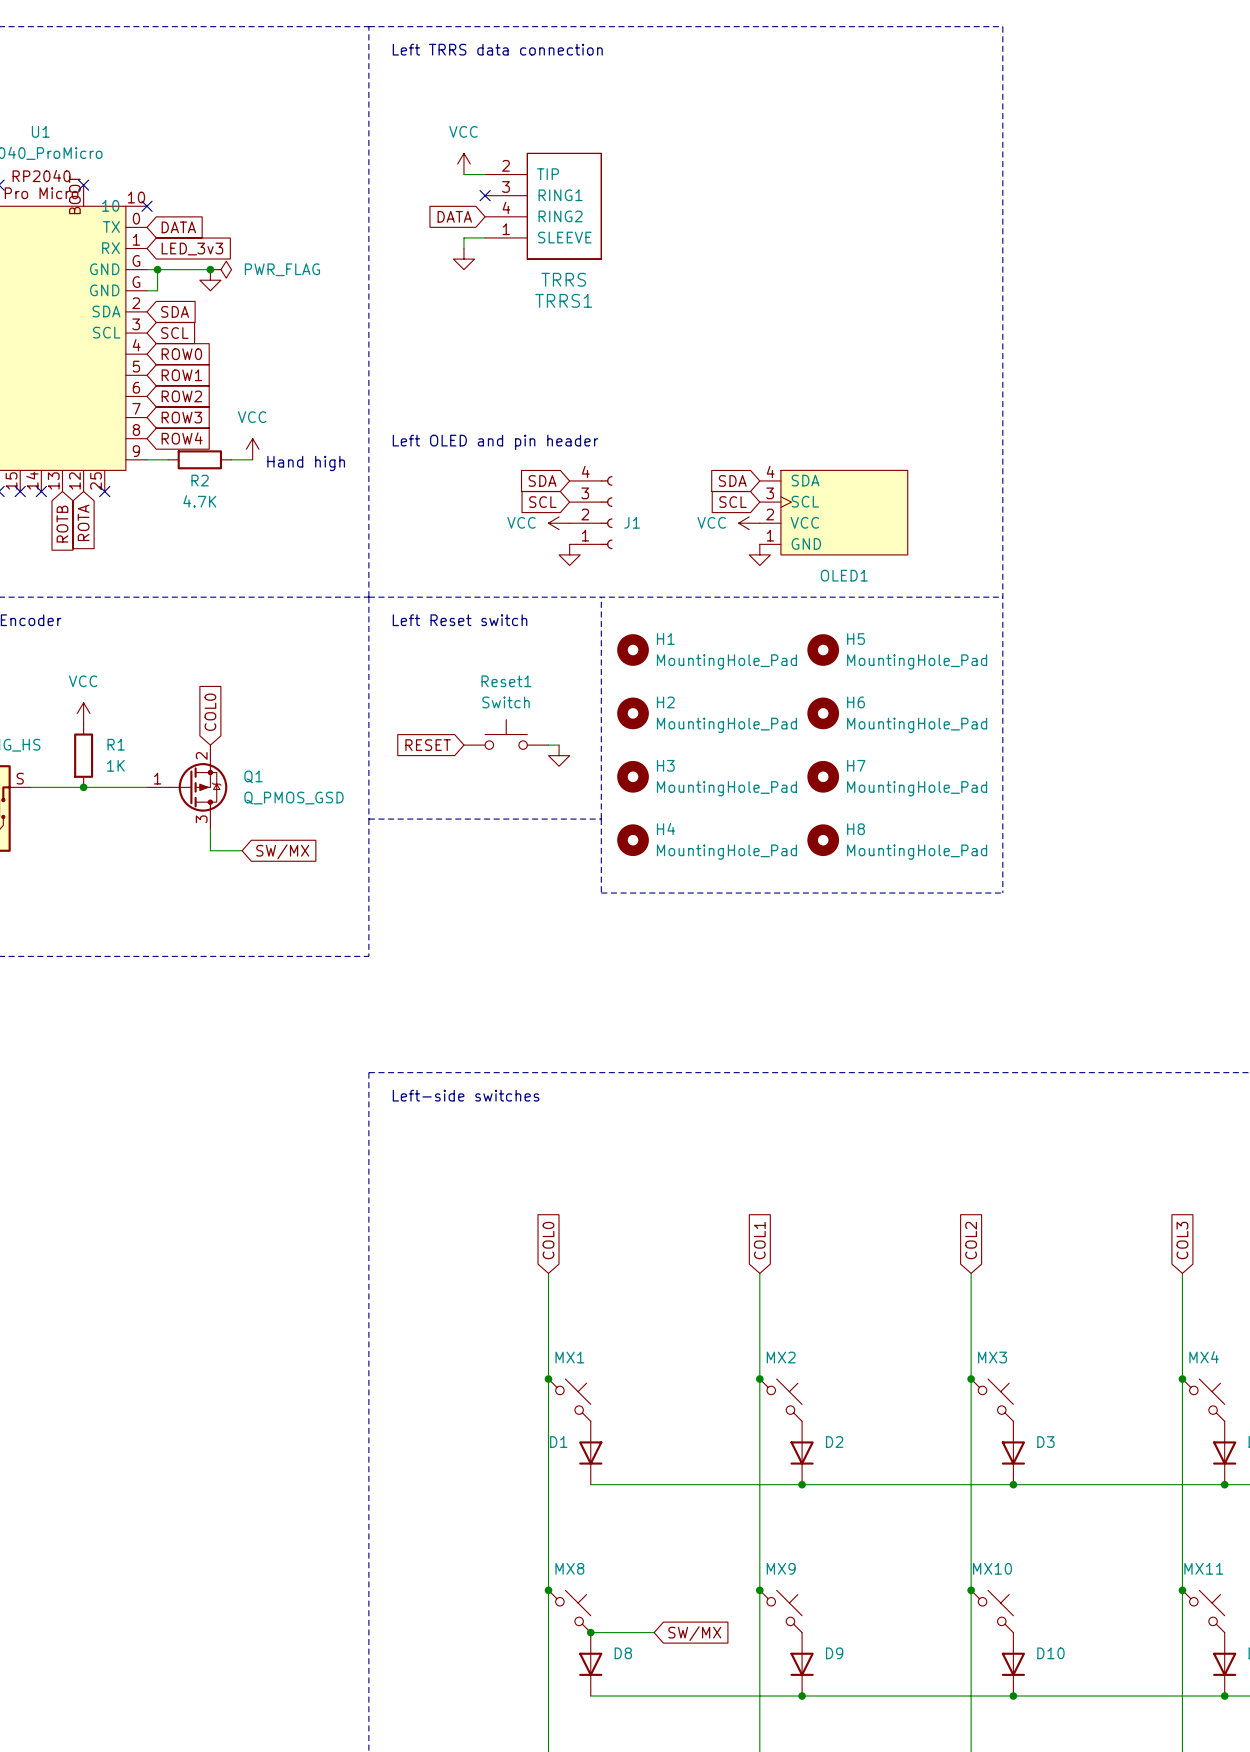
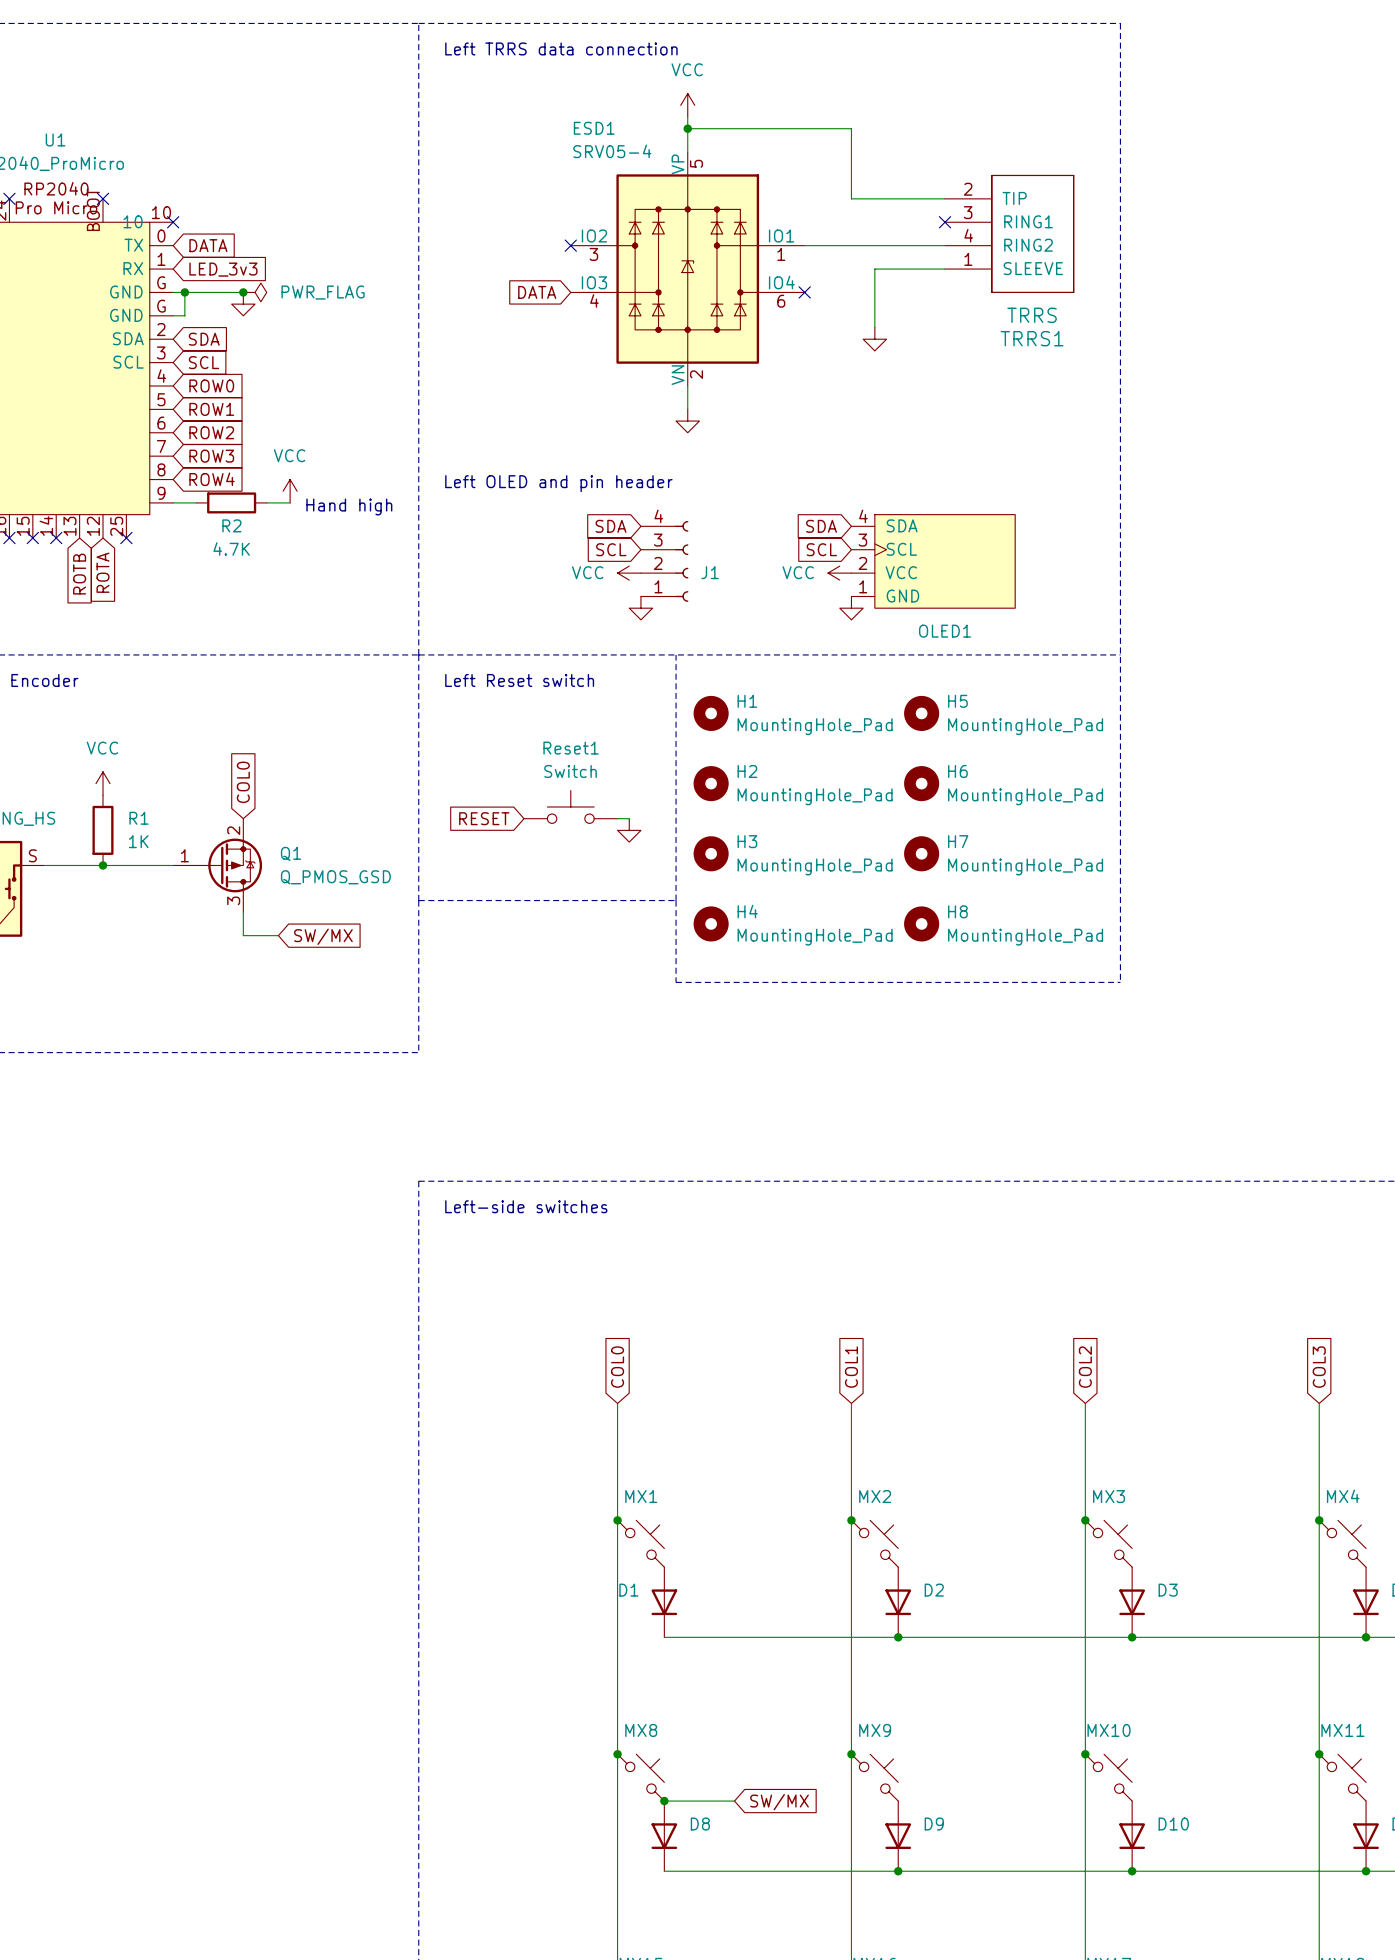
wire: none -> (687, 117) (687, 152)
wire: none -> (687, 128) (851, 128) (851, 198) (945, 198)
junction: none -> (687, 128)
power symbol position: VCC (463, 163) -> VCC (687, 105)
wire: (463, 174) (485, 174) -> none
no-connect mark position: (485, 195) -> (570, 245)
TRRS1 position: (543, 206) -> (1009, 233)
no-connect mark: none -> (945, 222)
global label position: DATA (454, 216) -> DATA (537, 292)
wire: none -> (804, 245) (945, 245)
wire: (485, 237) (463, 237) (463, 248) -> none
ESD1: none -> SRV05-4 (687, 269)
wire: none -> (945, 269) (874, 269) (874, 327)
power symbol: (463, 259) -> none
no-connect mark: none -> (804, 292)
power symbol: none -> (874, 339)
wire: none -> (687, 385) (687, 409)
power symbol: none -> (687, 421)

